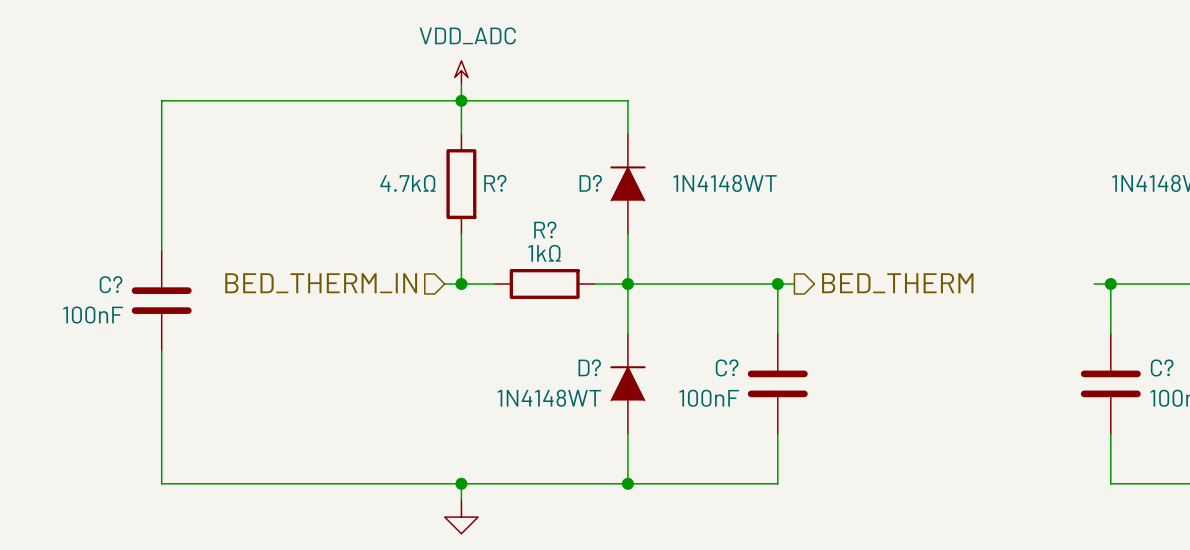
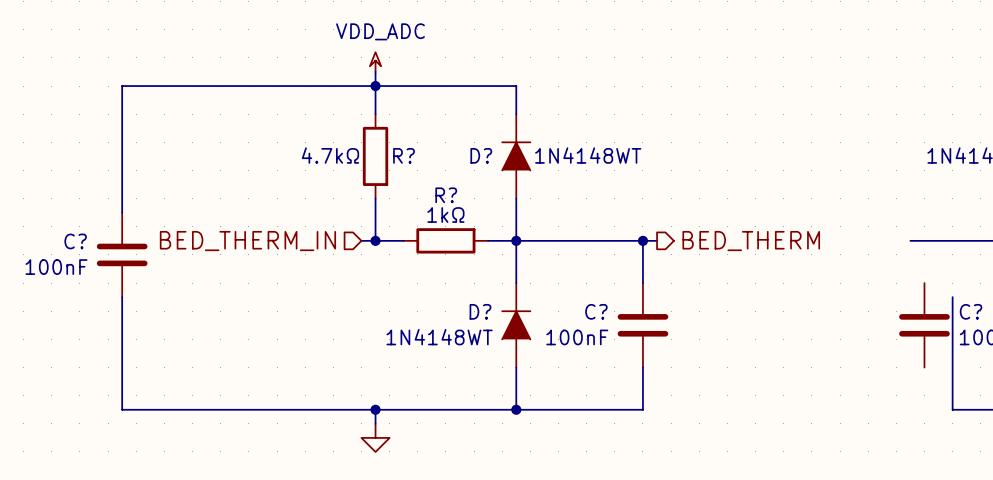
wire: (1110, 283) (1110, 333) -> none
junction: (1110, 283) -> none
wire: (1110, 433) (1110, 483) (1144, 483) -> (952, 297) (952, 409)

